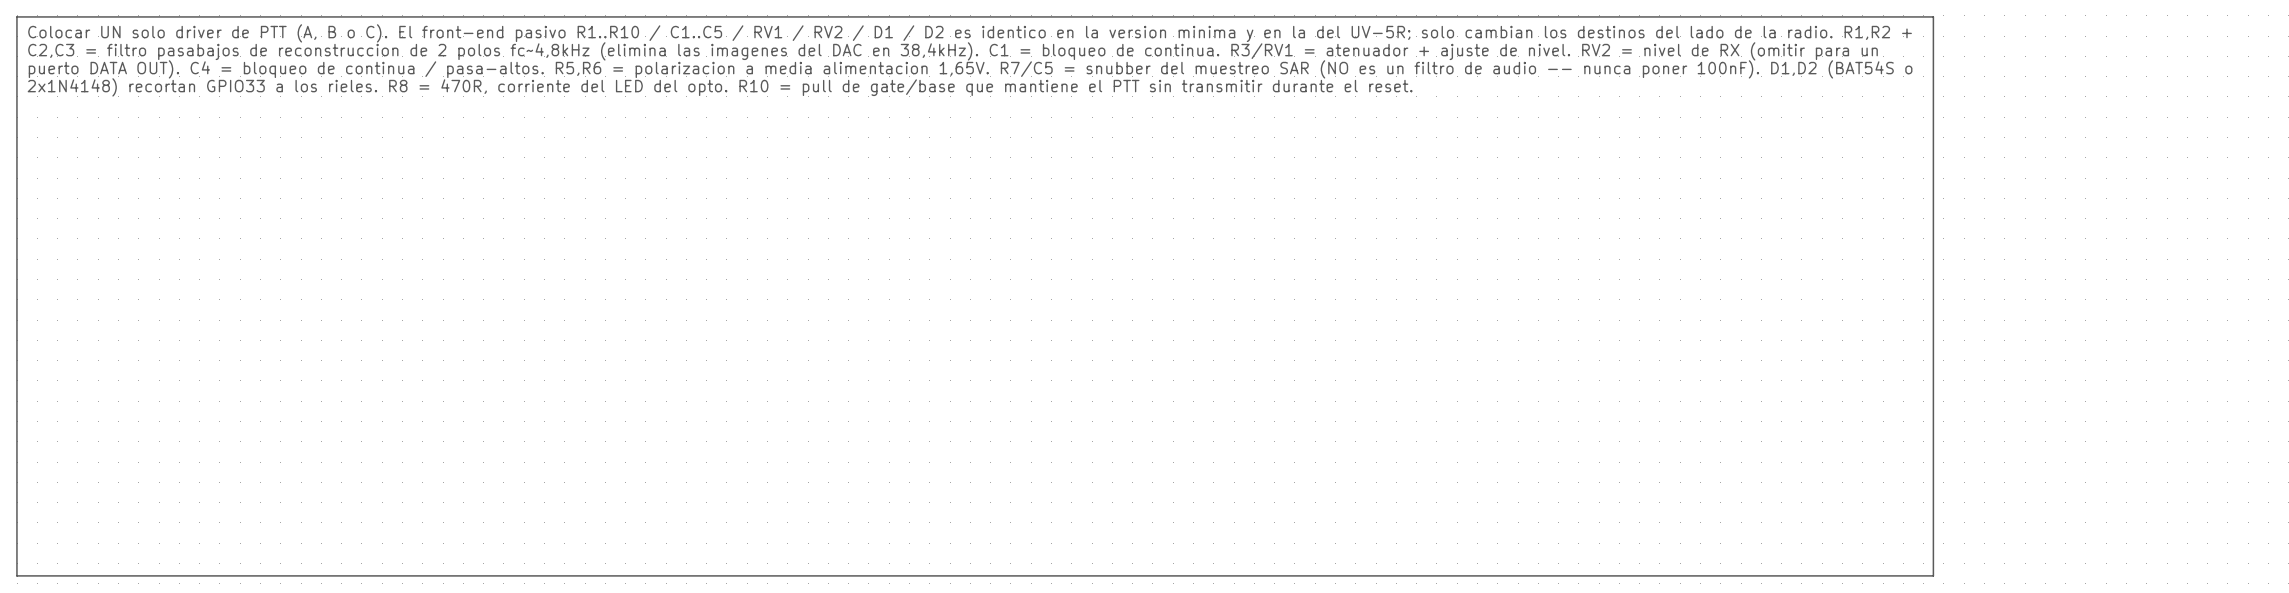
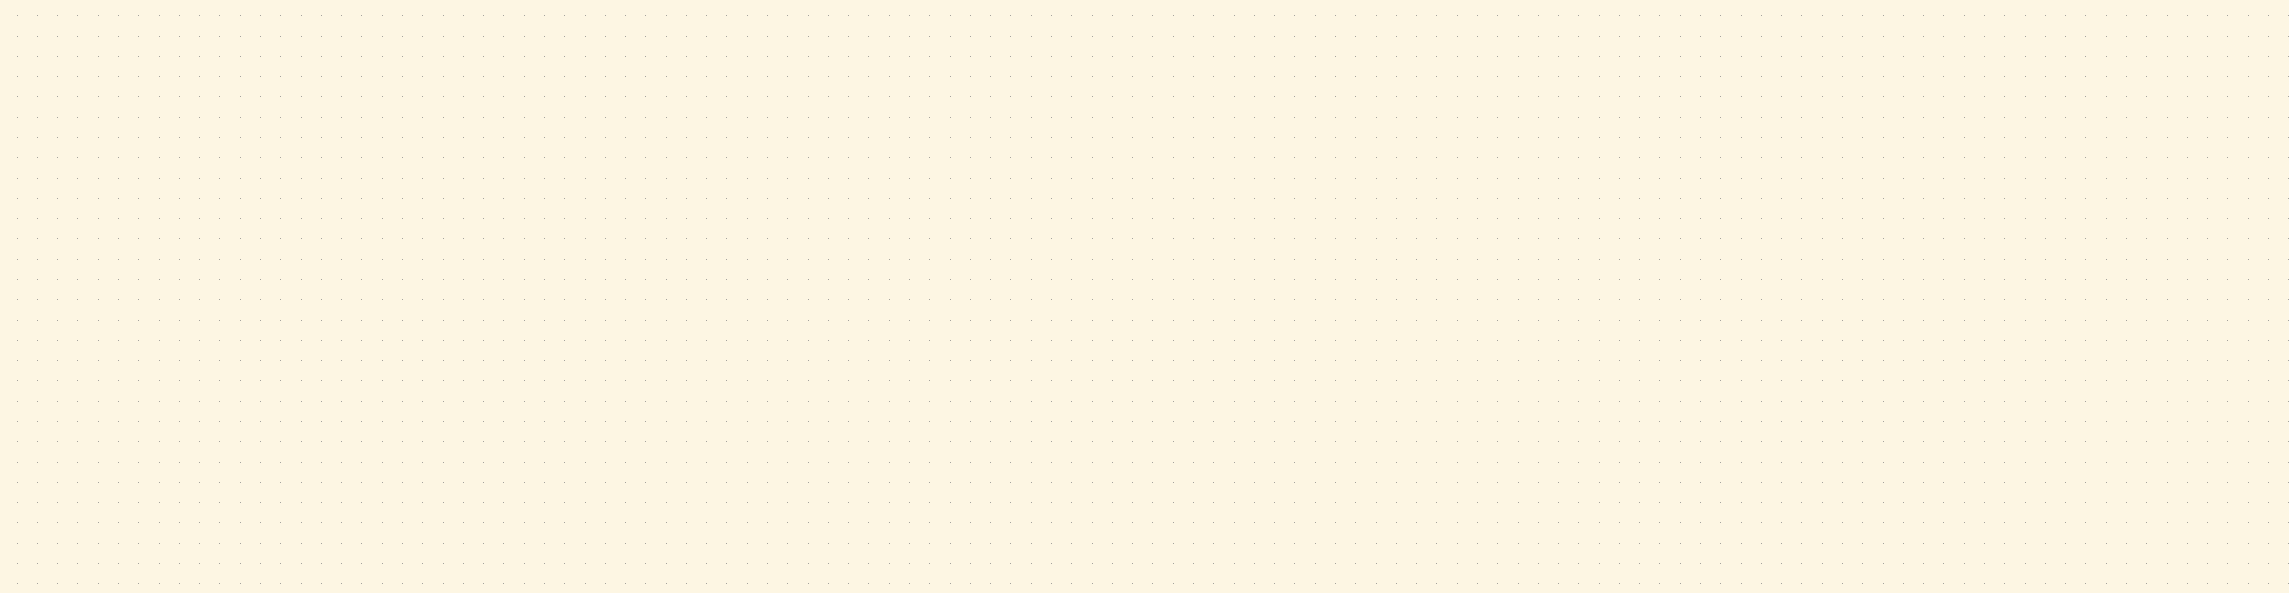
line: (16, 16) (1933, 16) (1933, 575) (16, 575) (16, 16) -> none
text: Colocar UN solo driver de PTT (A, B o C). El front-end pasivo R1..R10 / C1..C5 / RV1 / RV2 / D1 / D2 es identico en la version minima y en la del UV-5R; solo cambian los destinos del lado de la radio. R1,R2 + (970, 33) -> none
text: C2,C3 = filtro pasabajos de reconstruccion de 2 polos fc~4,8kHz (elimina las imagenes del DAC en 38,4kHz). C1 = bloqueo de continua. R3/RV1 = atenuador + ajuste de nivel. RV2 = nivel de RX (omitir para un (953, 51) -> none
text: puerto DATA OUT). C4 = bloqueo de continua / pasa-altos. R5,R6 = polarizacion a media alimentacion 1,65V. R7/C5 = snubber del muestreo SAR (NO es un filtro de audio -- nunca poner 100nF). D1,D2 (BAT54S o (970, 69) -> none
text: 2x1N4148) recortan GPIO33 a los rieles. R8 = 470R, corriente del LED del opto. R10 = pull de gate/base que mantiene el PTT sin transmitir durante el reset. (720, 87) -> none

